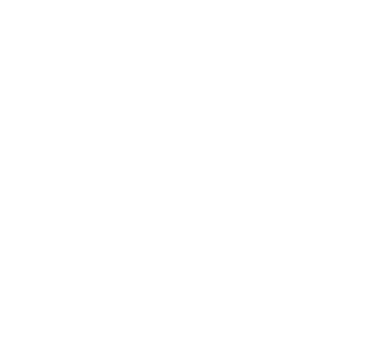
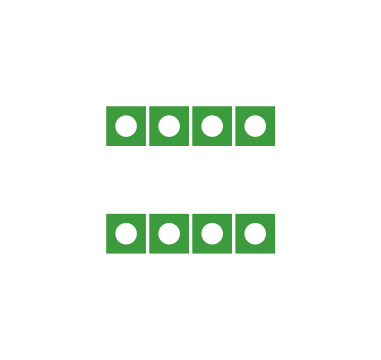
part: none -> (190, 179)

